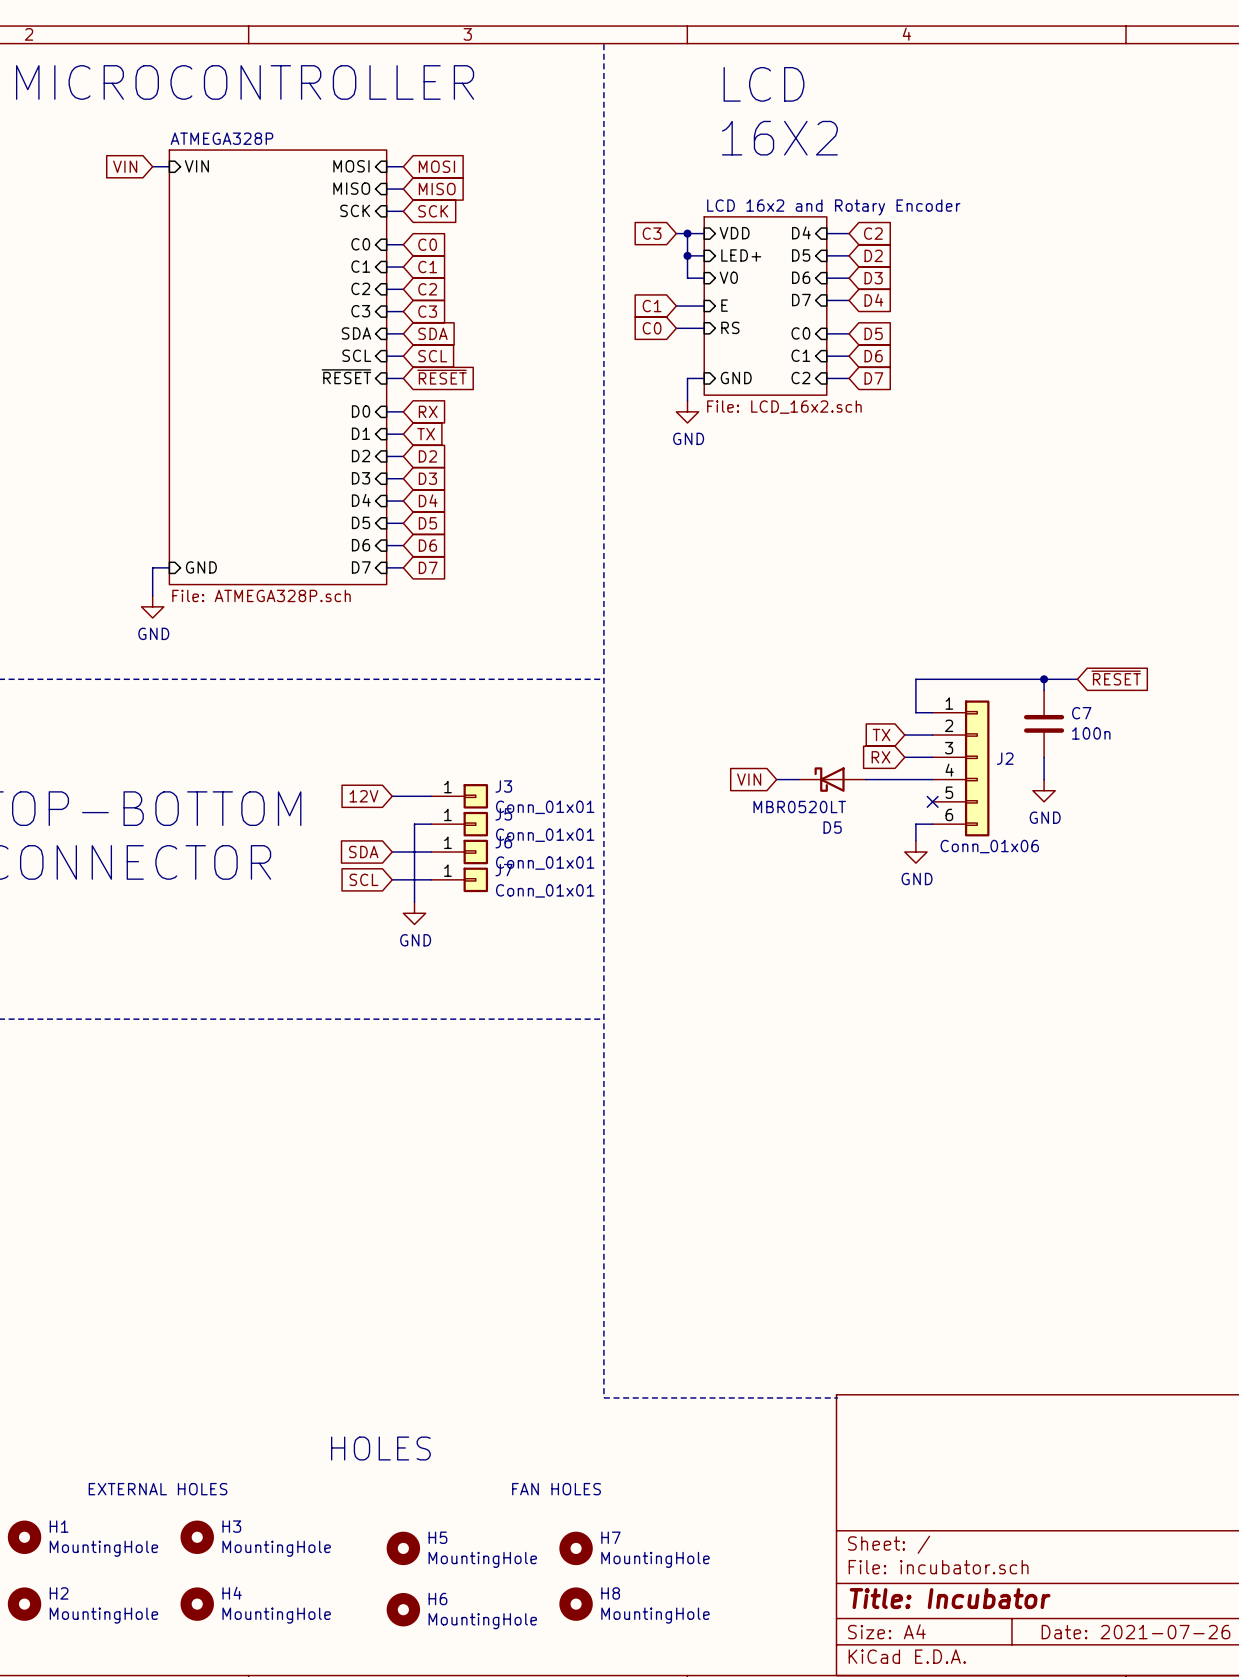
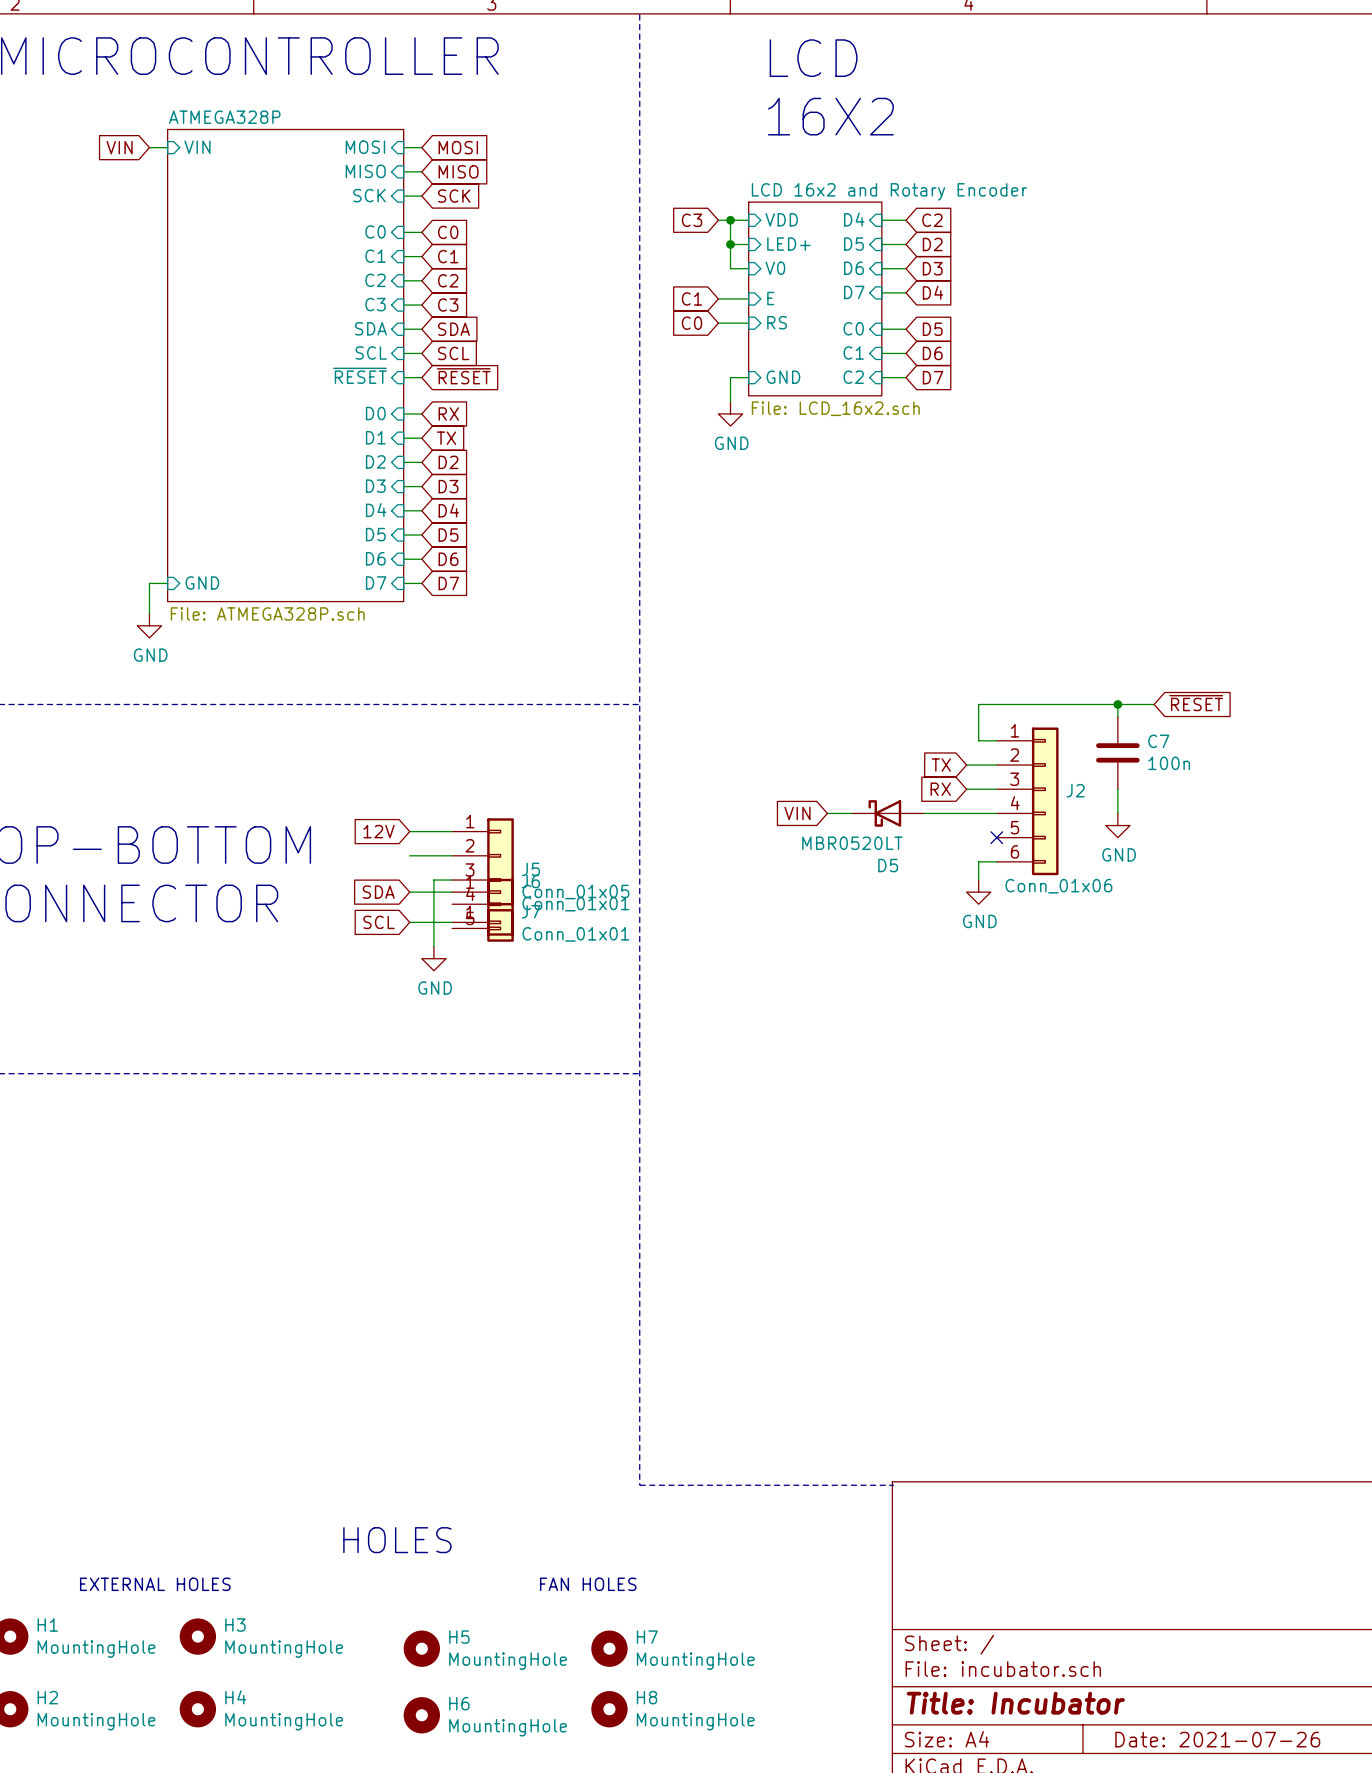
J3: Conn_01x01 (459, 796) -> none
J5 symbol: [431, 811, 489, 837] -> [452, 818, 514, 942]
wire: none -> (409, 855) (452, 855)
wire: (431, 824) (414, 824) (414, 840) -> (452, 880) (433, 880)
J5 value: Conn_01x01 (545, 835) -> Conn_01x05 (575, 892)

